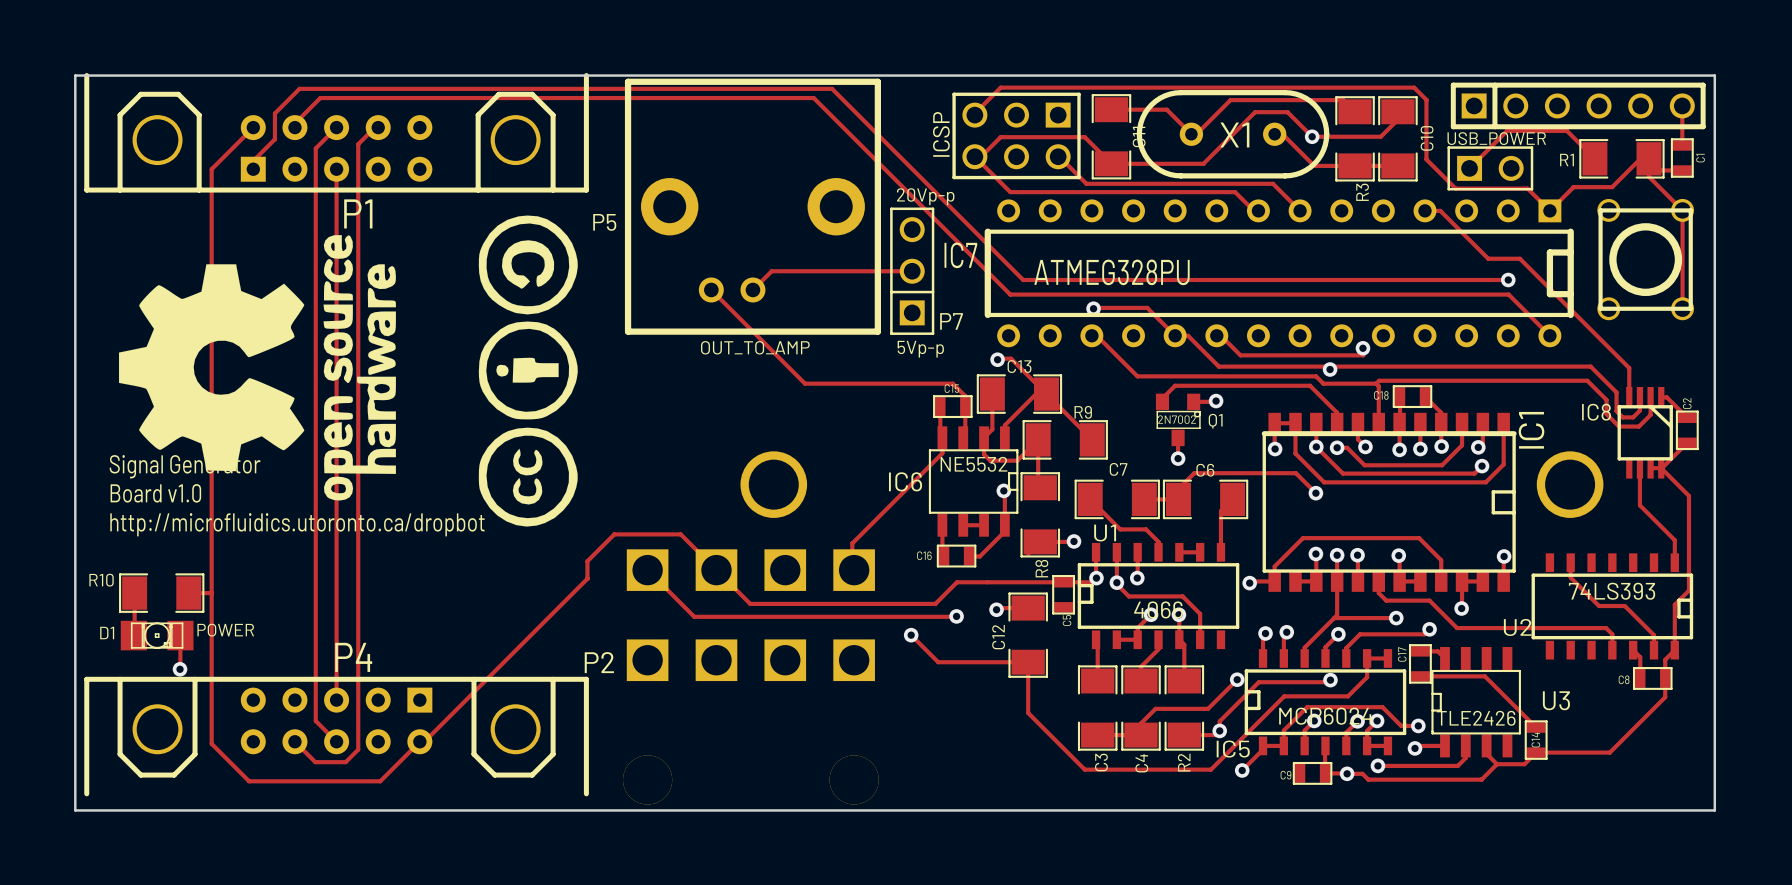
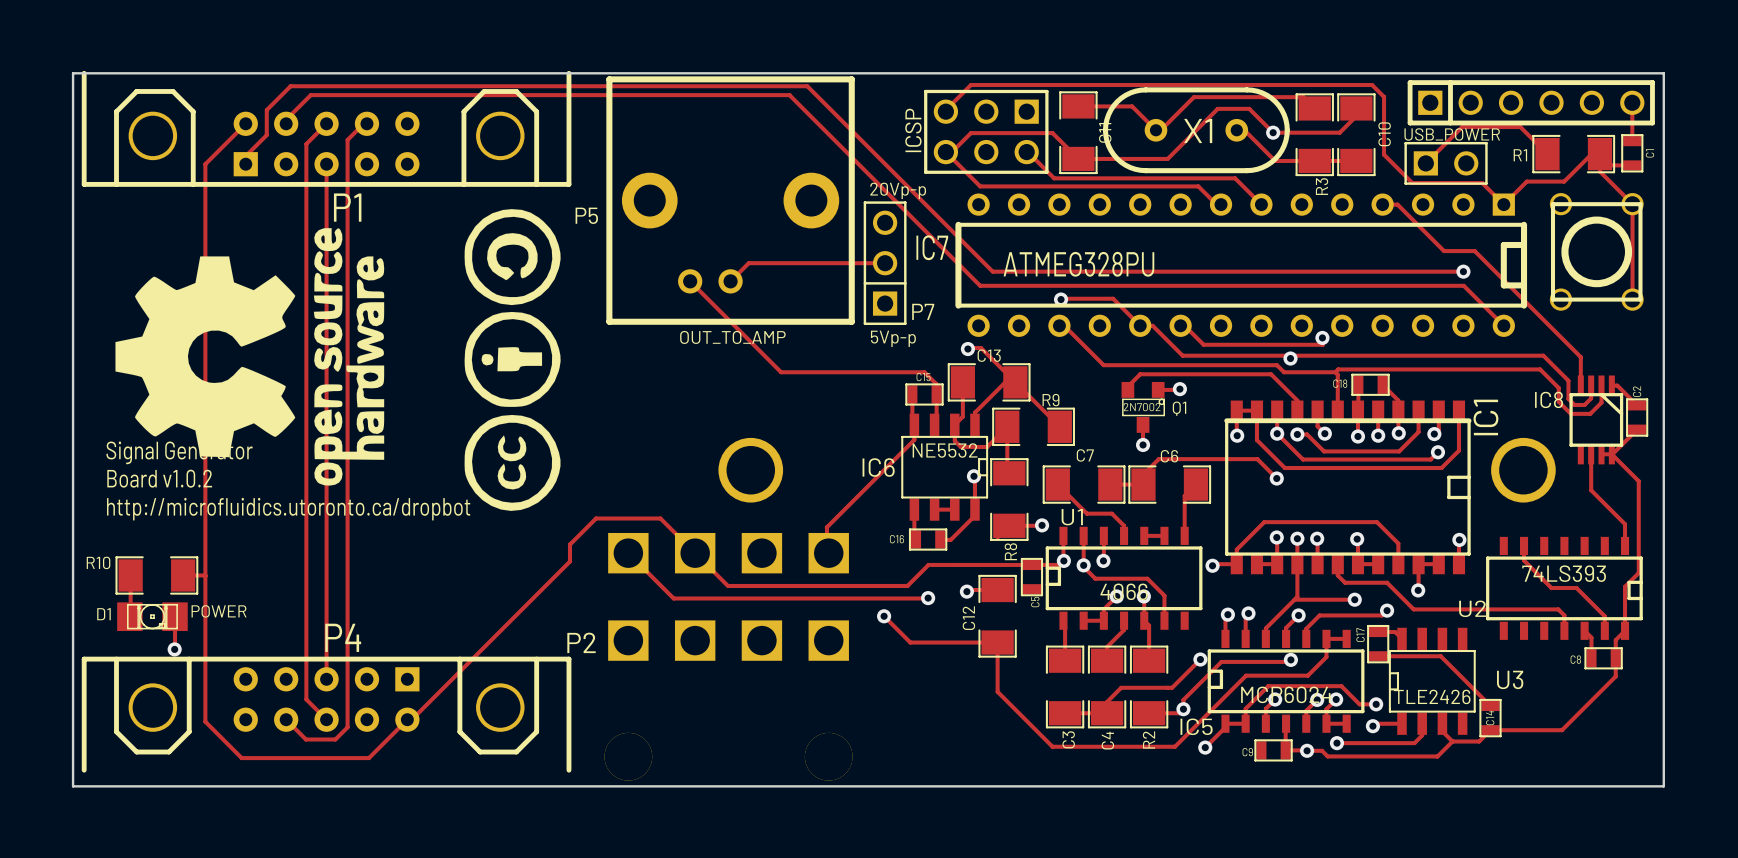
text: Board v1.0 (155, 493) -> Board v1.0.2 (159, 478)

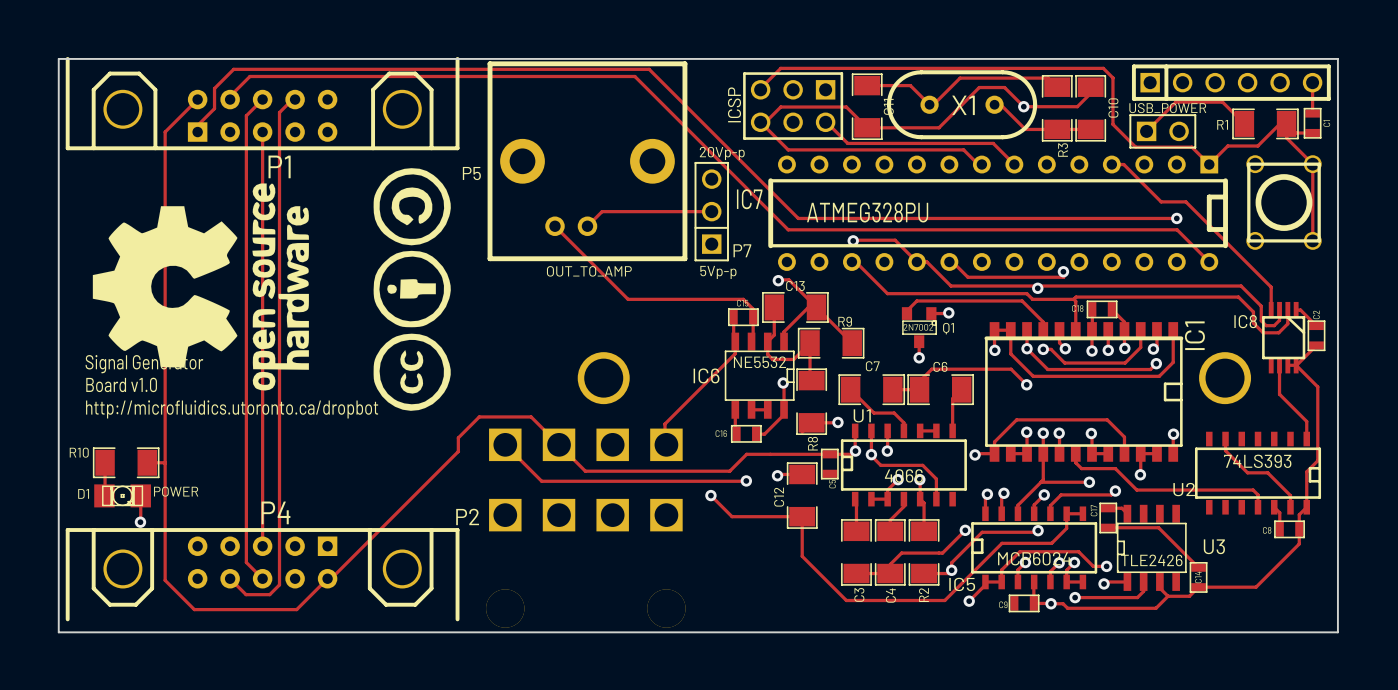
text: Board v1.0.2 (159, 478) -> Board v1.0 (121, 384)

